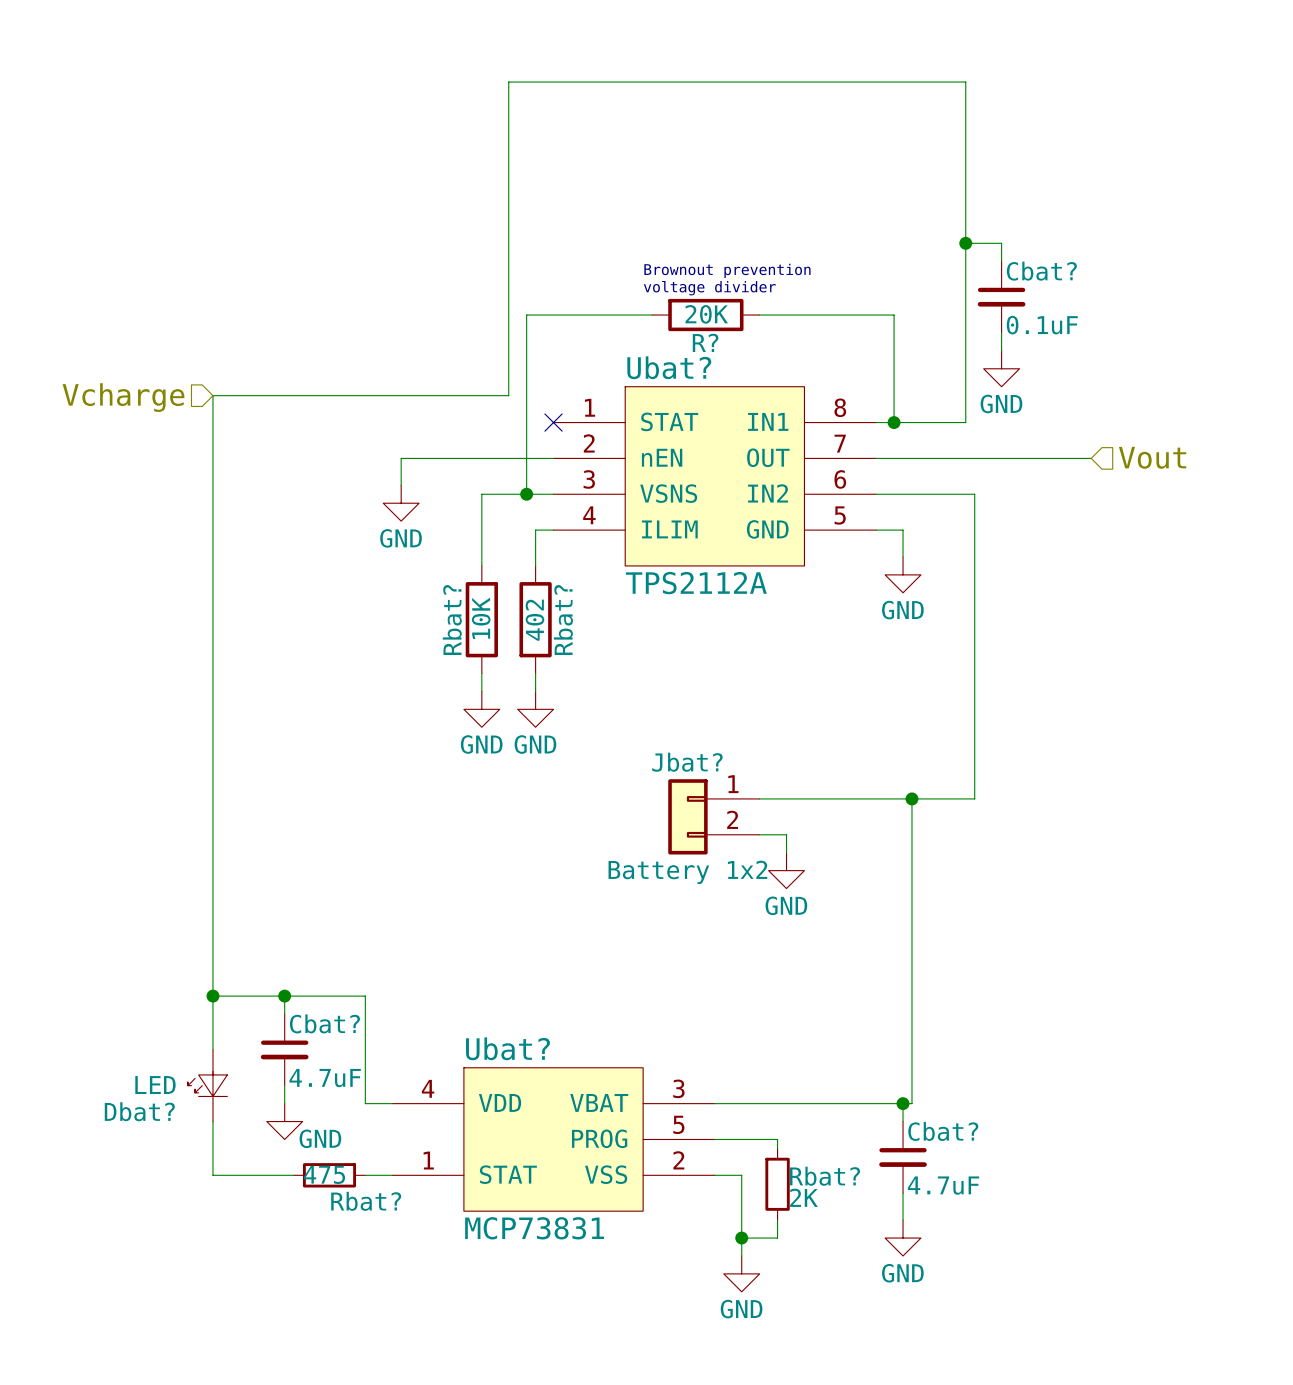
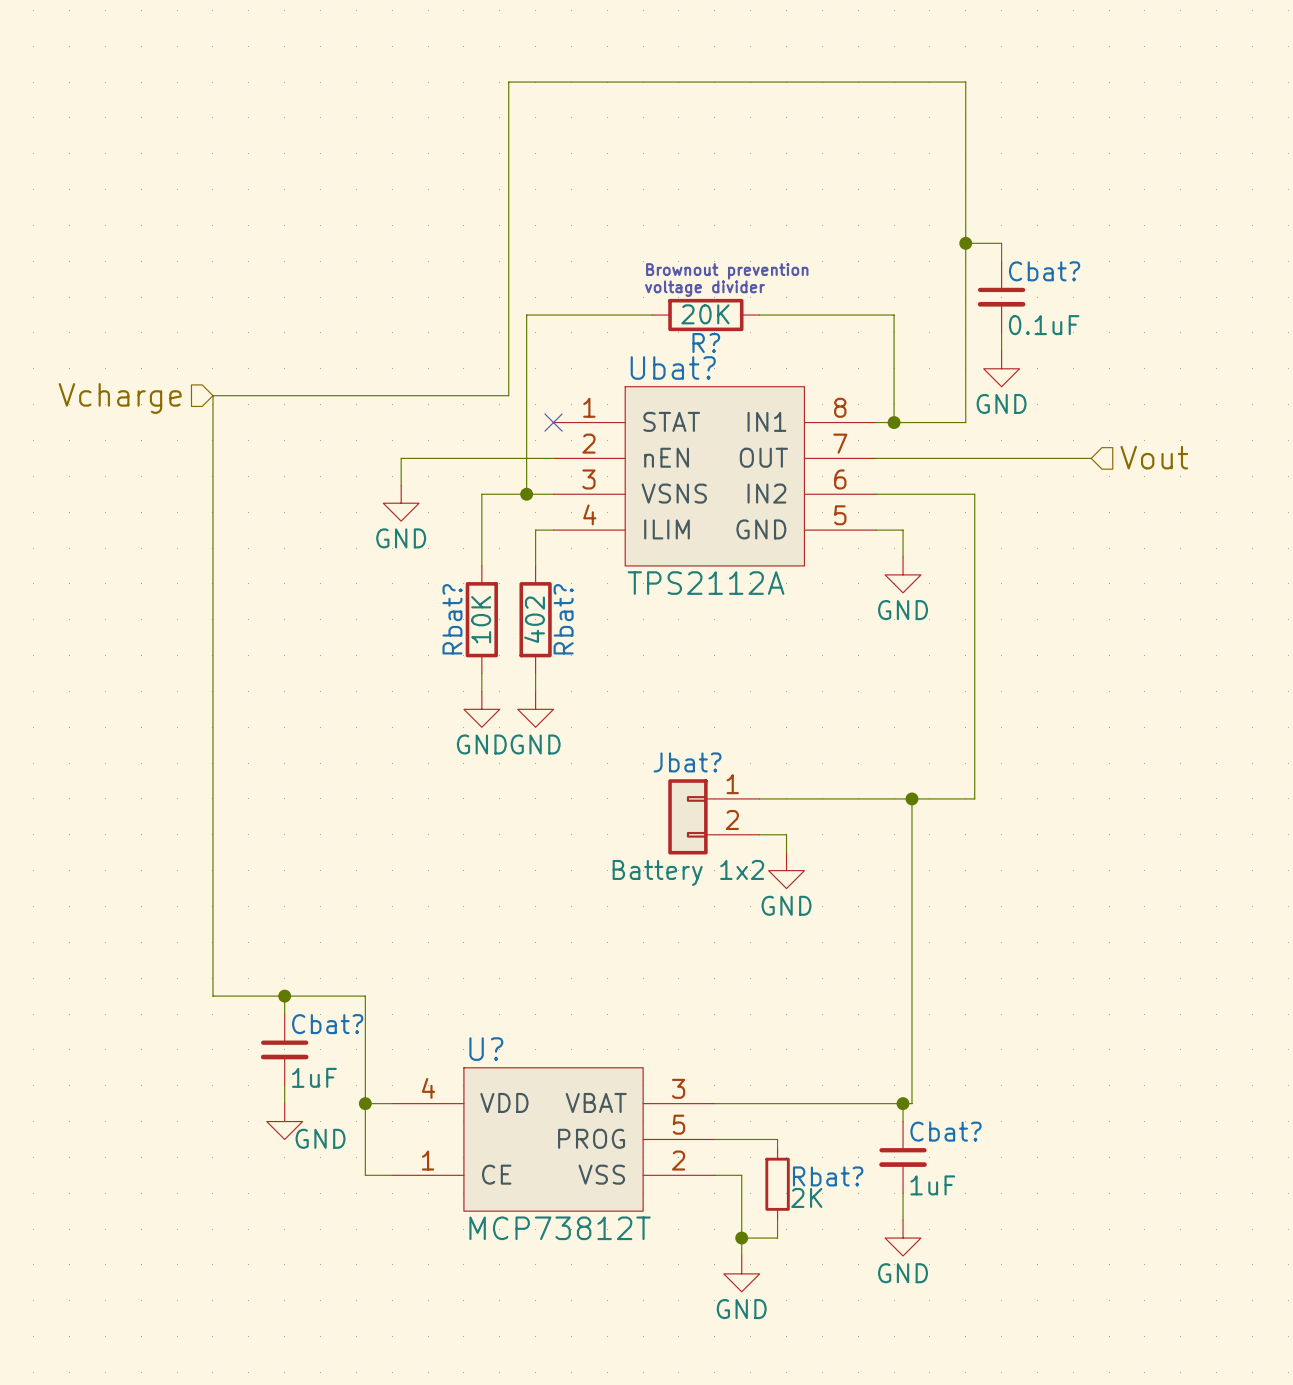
wire: (212, 996) (212, 1049) -> none
junction: (212, 996) -> none
Ubat? name: Ubat? (507, 1048) -> U? (486, 1049)
Cbat? value: 4.7uF (325, 1078) -> 1uF (314, 1077)
Dbat?: LED (207, 1085) -> none
wire: none -> (365, 1103) (365, 1175)
junction: none -> (365, 1103)
wire: (212, 1121) (212, 1175) (293, 1175) -> none
Ubat? pin name: STAT (508, 1174) -> CE (496, 1174)
Rbat?: 475 (329, 1175) -> none
Cbat? value: 4.7uF (943, 1185) -> 1uF (932, 1185)
Ubat? value: MCP73831 (534, 1228) -> MCP73812T (560, 1228)

